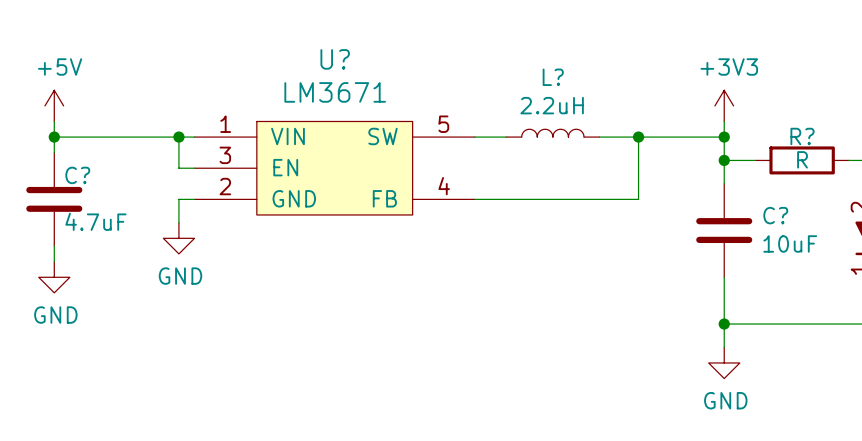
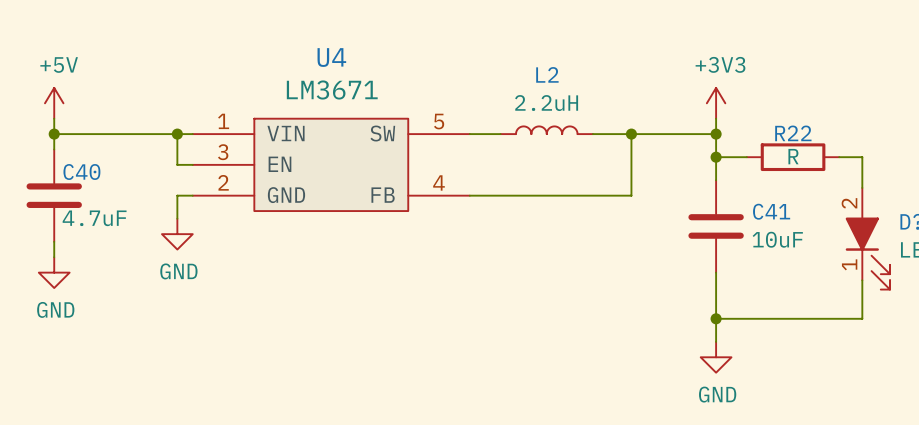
U? name: U? (335, 59) -> U4 (331, 57)
L? name: L? (553, 77) -> L2 (547, 74)
R? name: R? (802, 136) -> R22 (793, 133)
C? name: C? (77, 175) -> C40 (81, 172)
C? name: C? (775, 215) -> C41 (771, 211)

